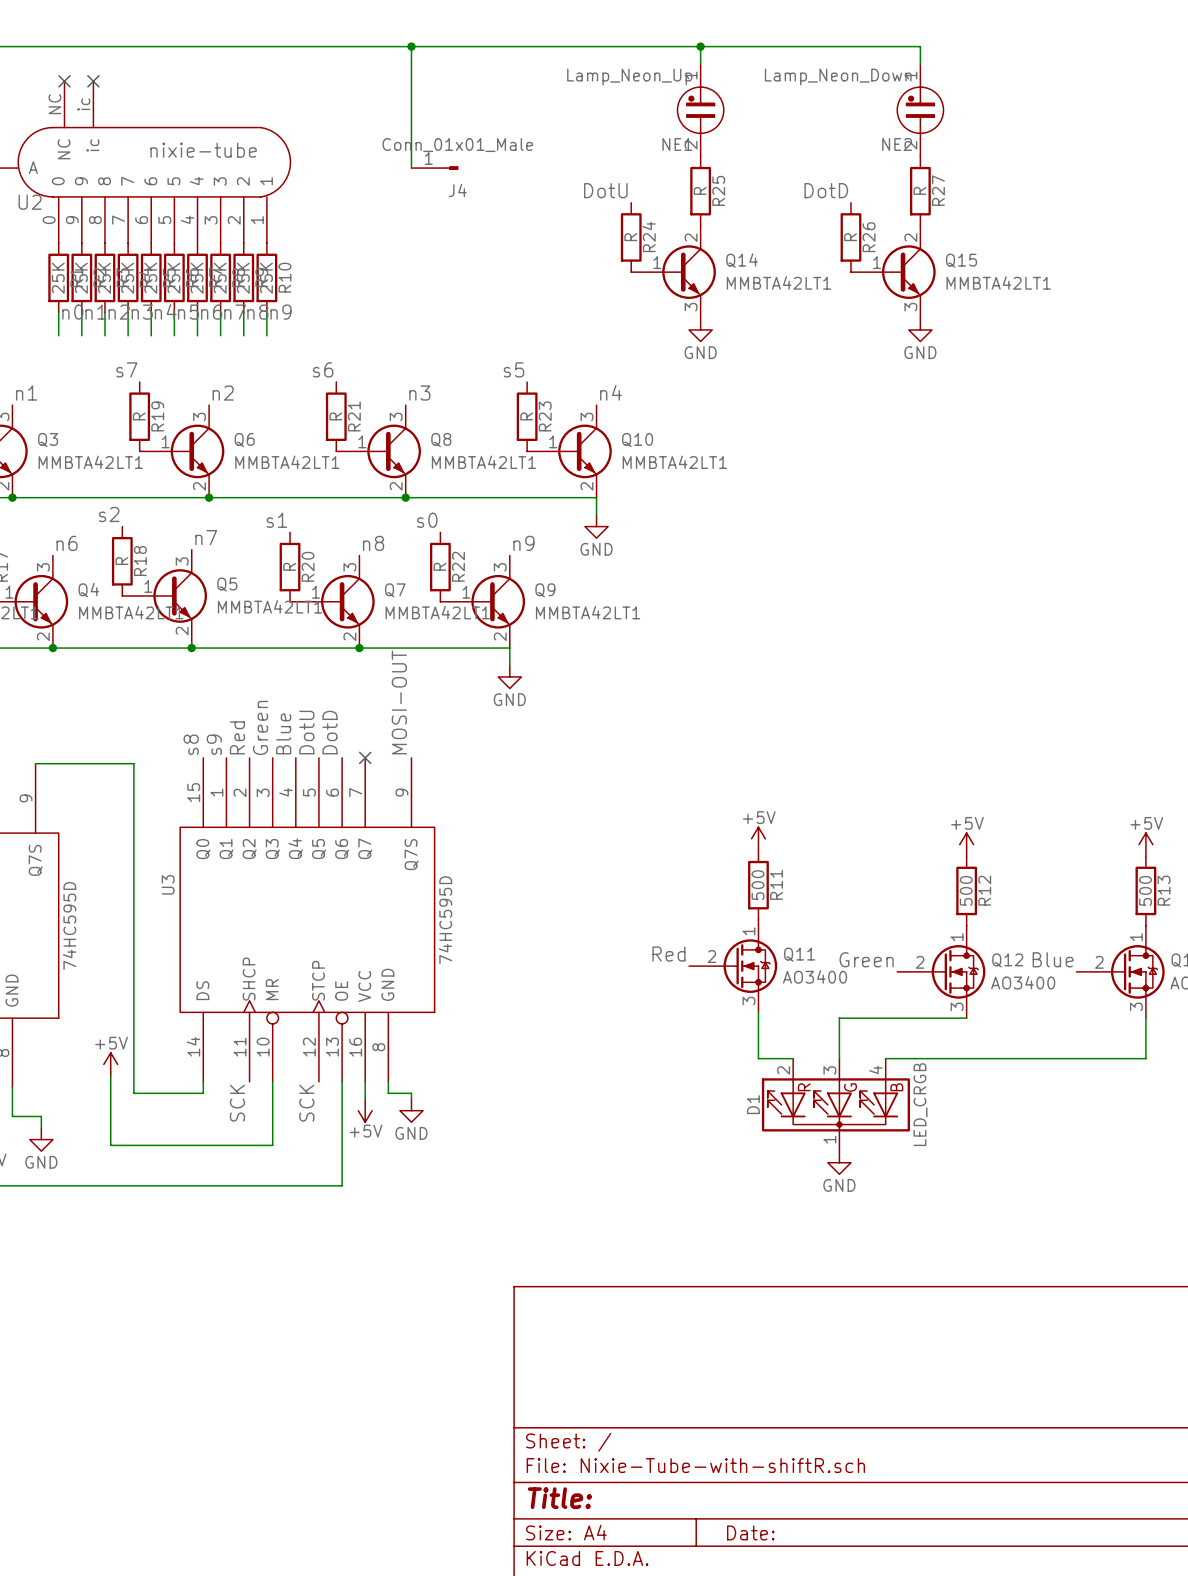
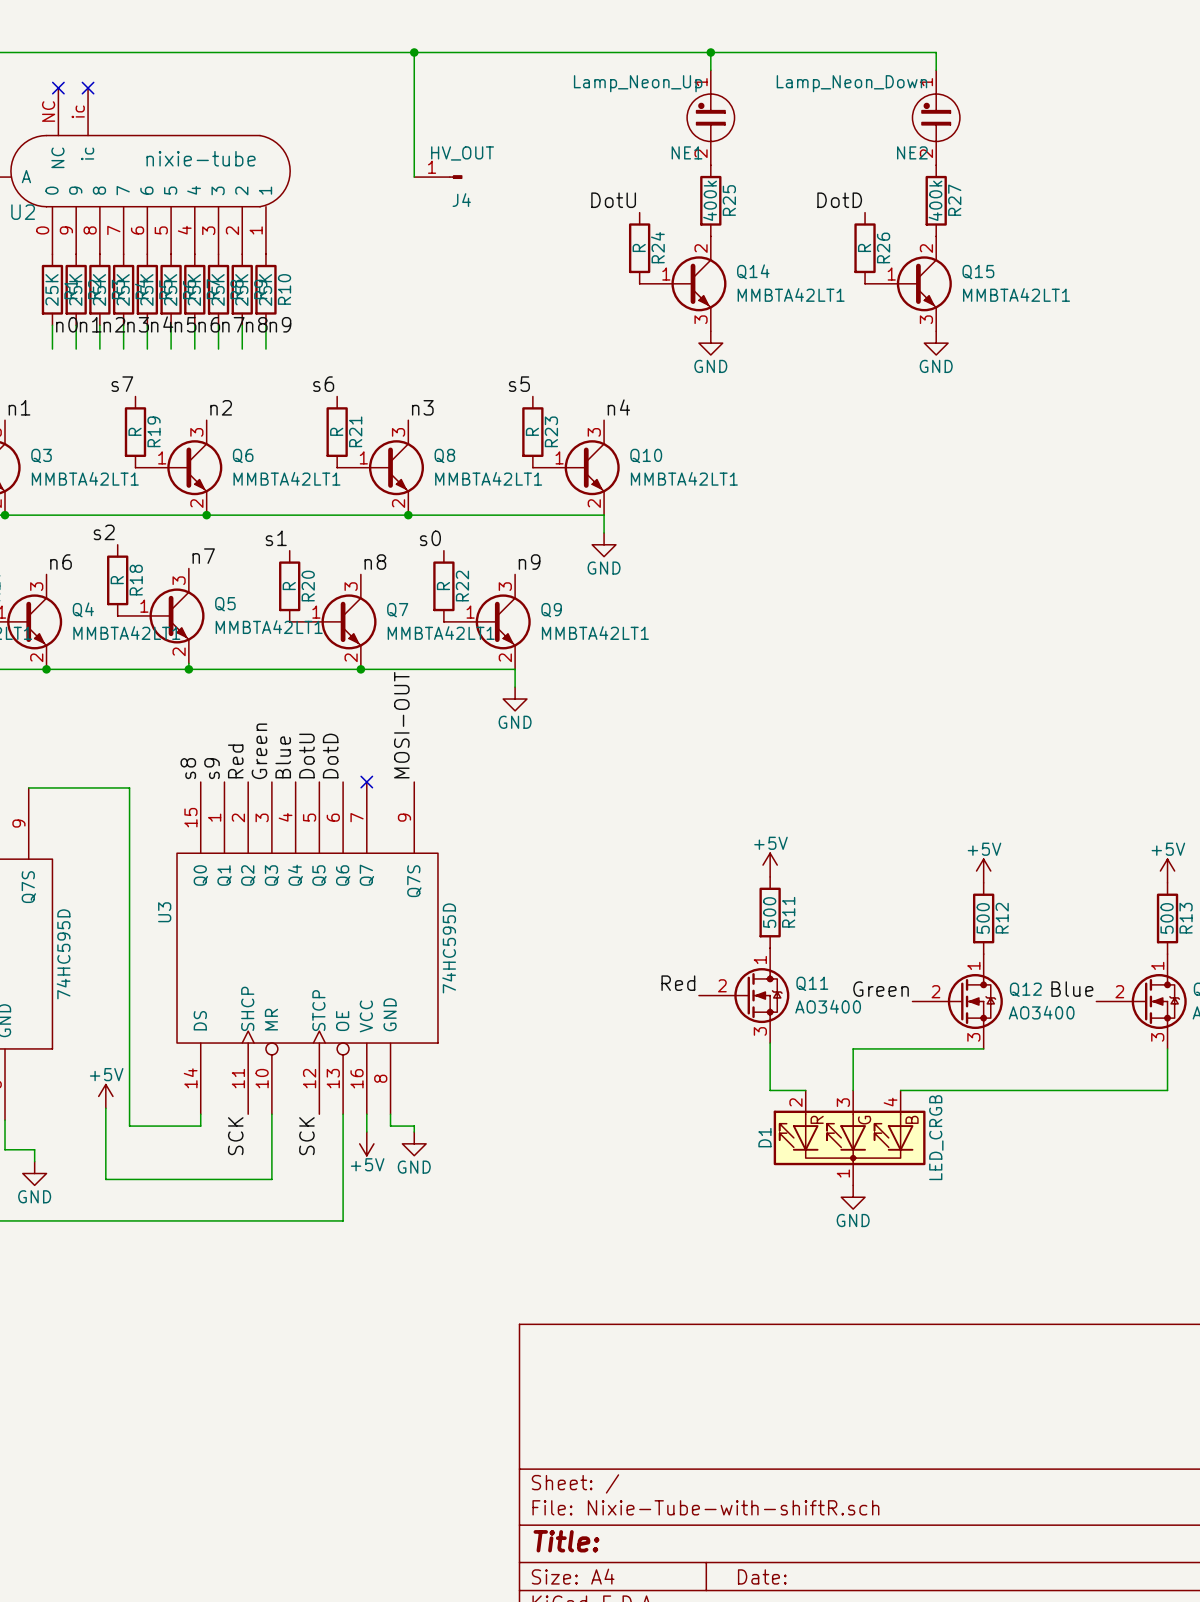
J4 value: Conn_01x01_Male (457, 145) -> HV_OUT (462, 153)
R25 value: R (700, 190) -> 400k (710, 200)
R27 value: R (919, 190) -> 400k (935, 200)

